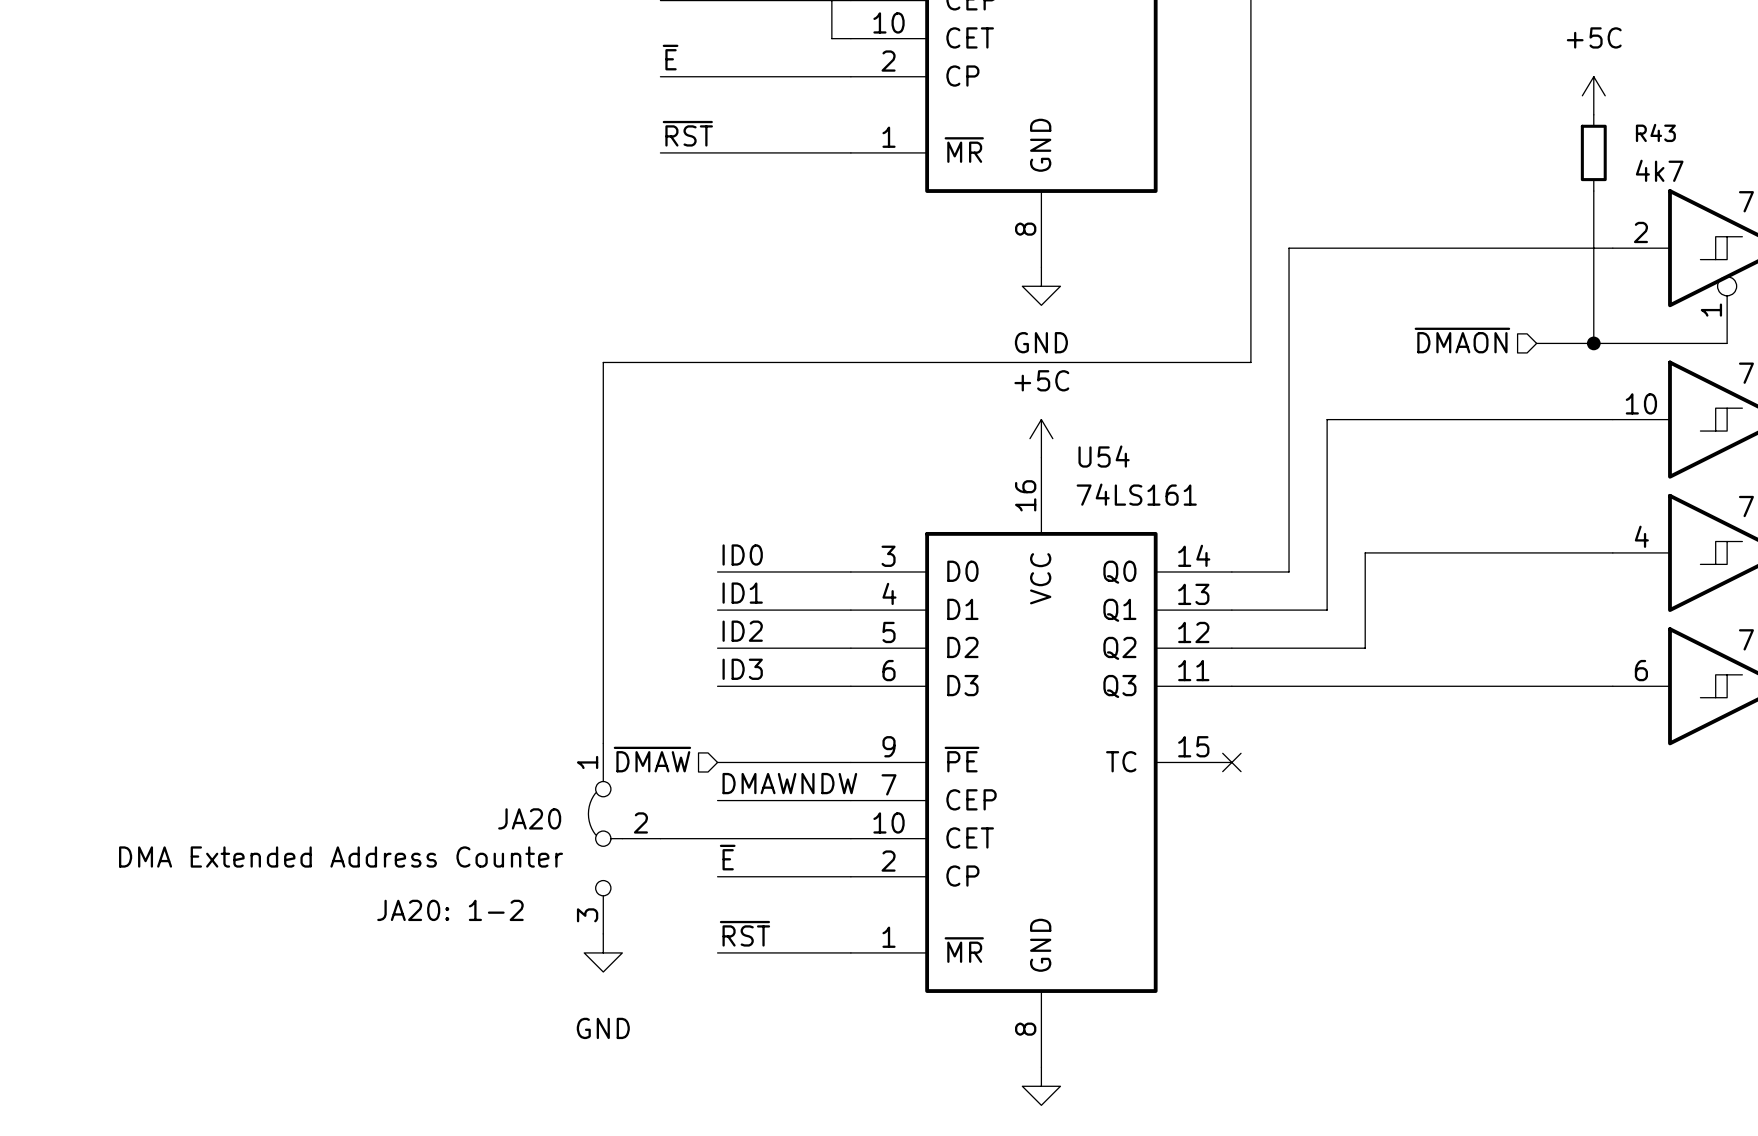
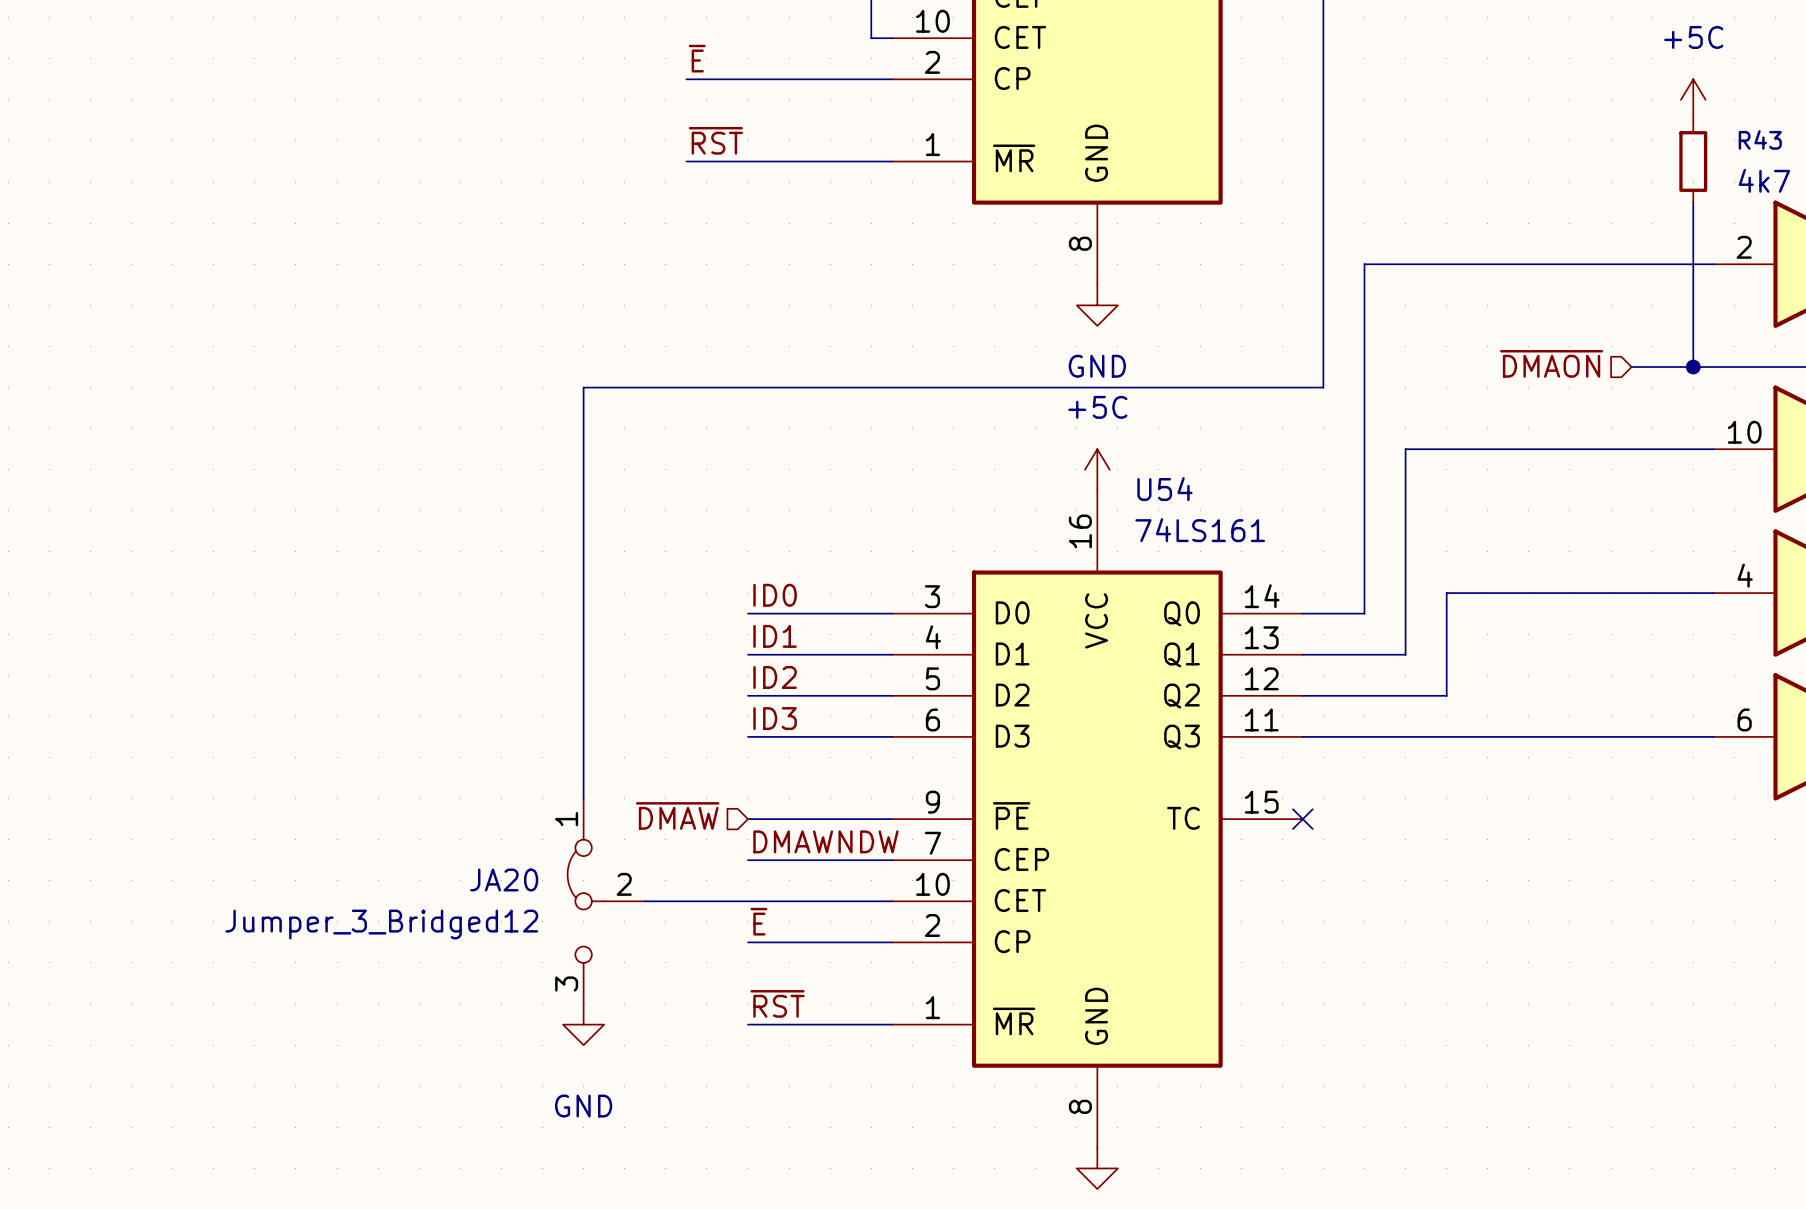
wire: (603, 362) (603, 743) -> (624, 387) (583, 387) (583, 798)
JA20 position: (624, 838) -> (606, 901)
JA20 value: DMA Extended Address Counter (341, 856) -> Jumper_3_Bridged12 (381, 924)
text: JA20: 1-2 (450, 910) -> none
power symbol position: GND (603, 952) -> GND (583, 1024)

